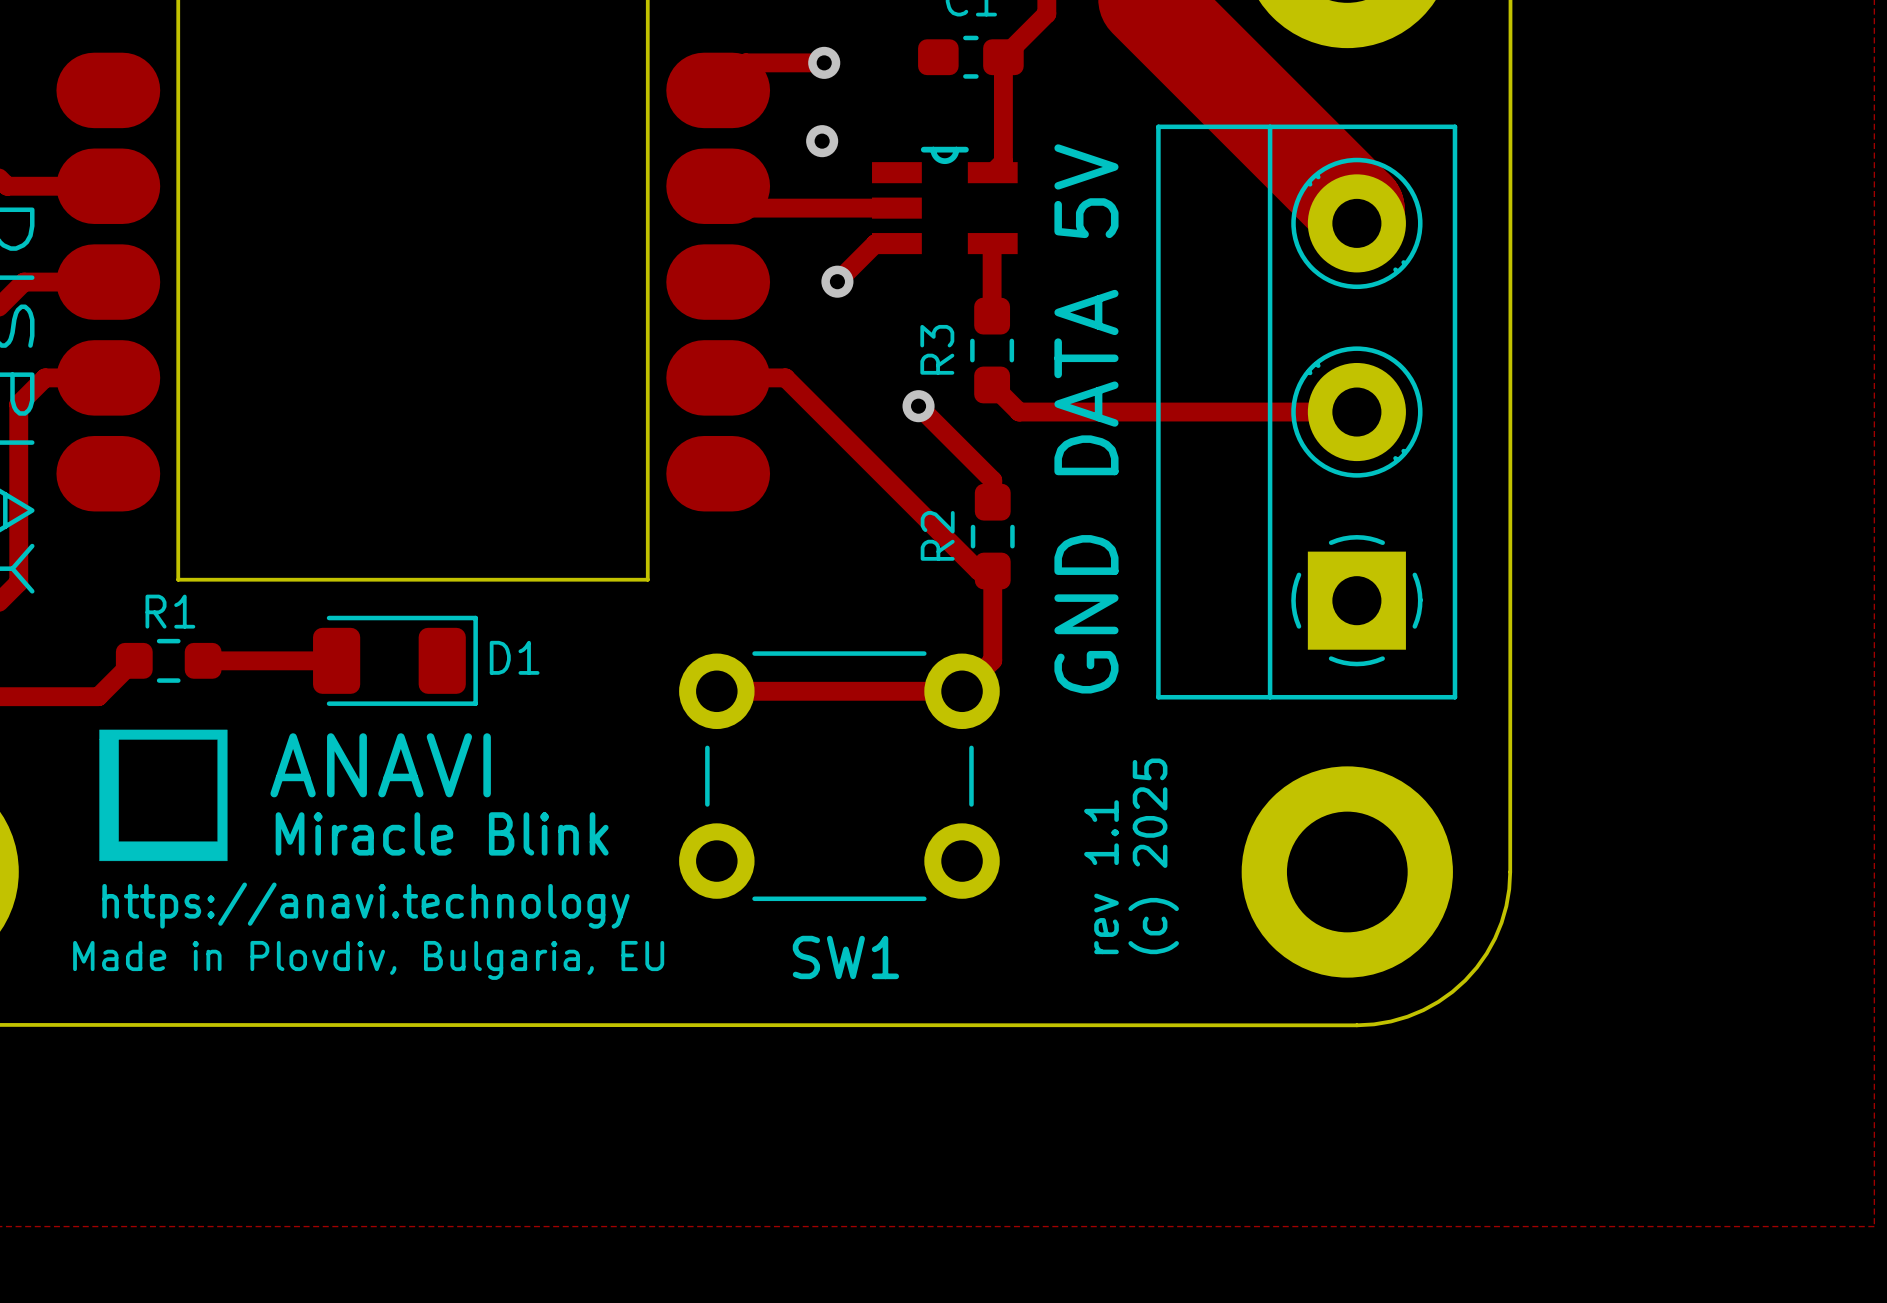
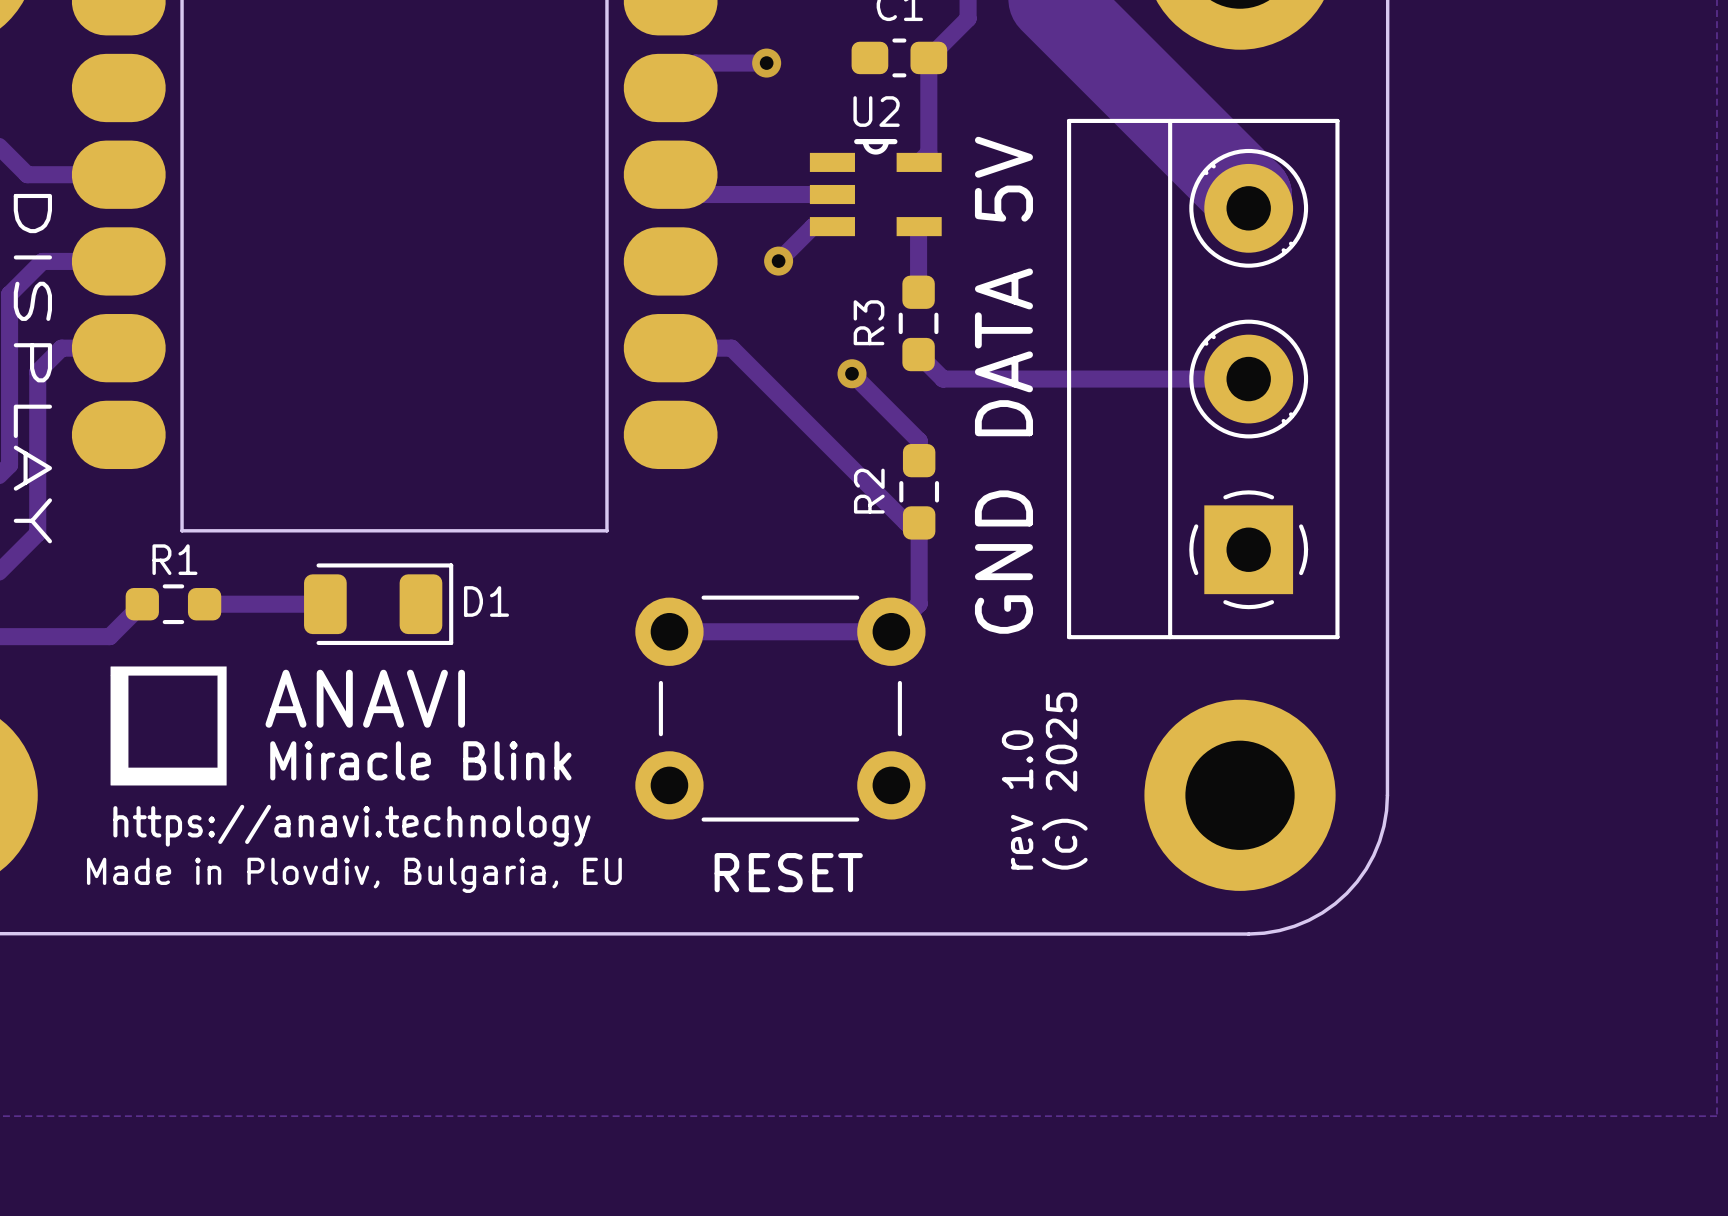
U2 name: none -> U2 (876, 111)
via: (822, 141) -> none
text: rev 1.1 (1101, 877) -> rev 1.0 (1017, 799)
SW1 name: SW1 (845, 957) -> RESET (788, 872)

